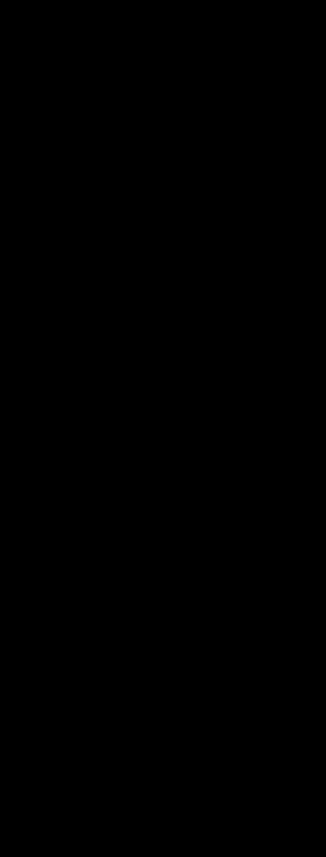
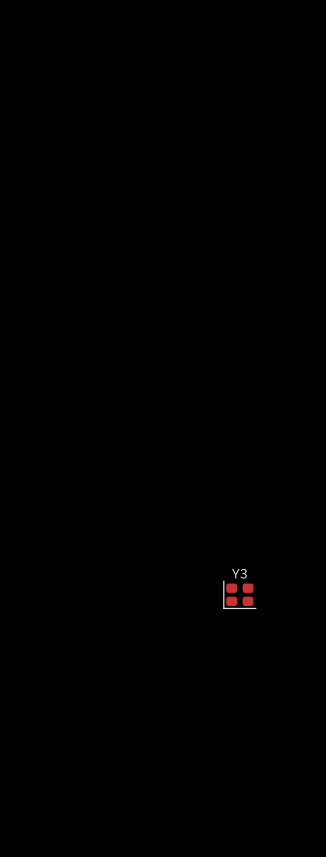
Y3: none -> (239, 594)

